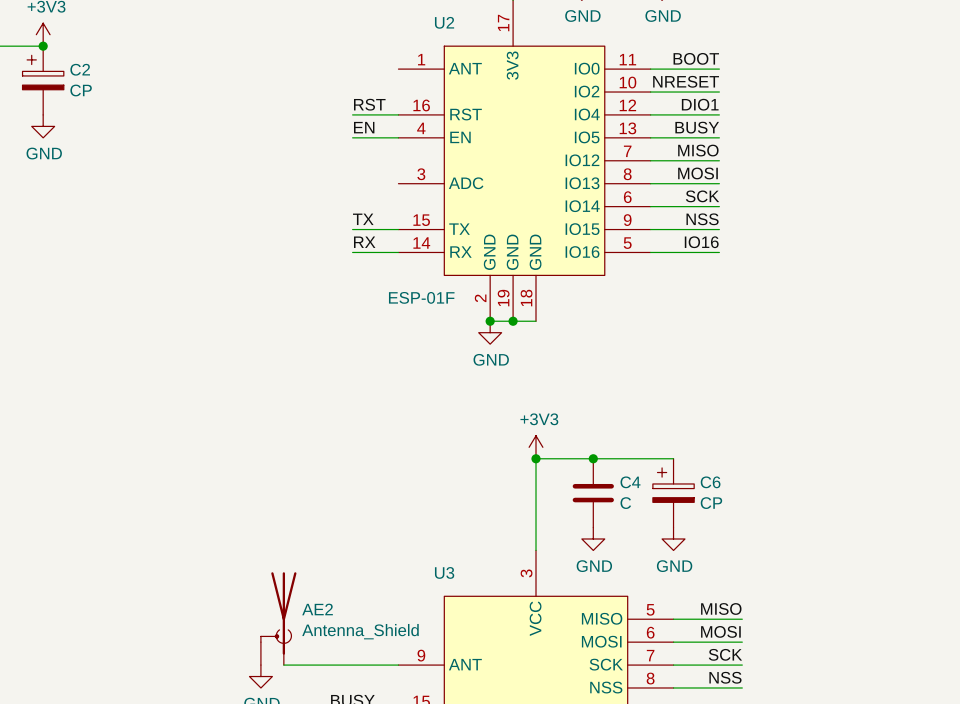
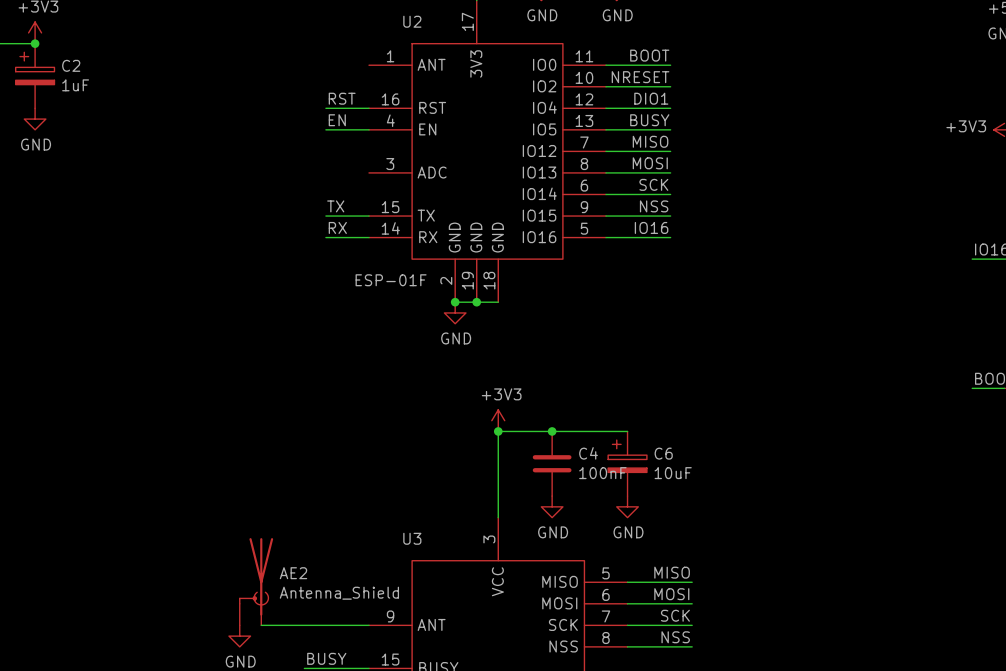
C2 value: CP (81, 90) -> 1uF (75, 85)
C4 value: C (625, 503) -> 100nF (602, 473)
C6 value: CP (711, 503) -> 10uF (673, 473)

